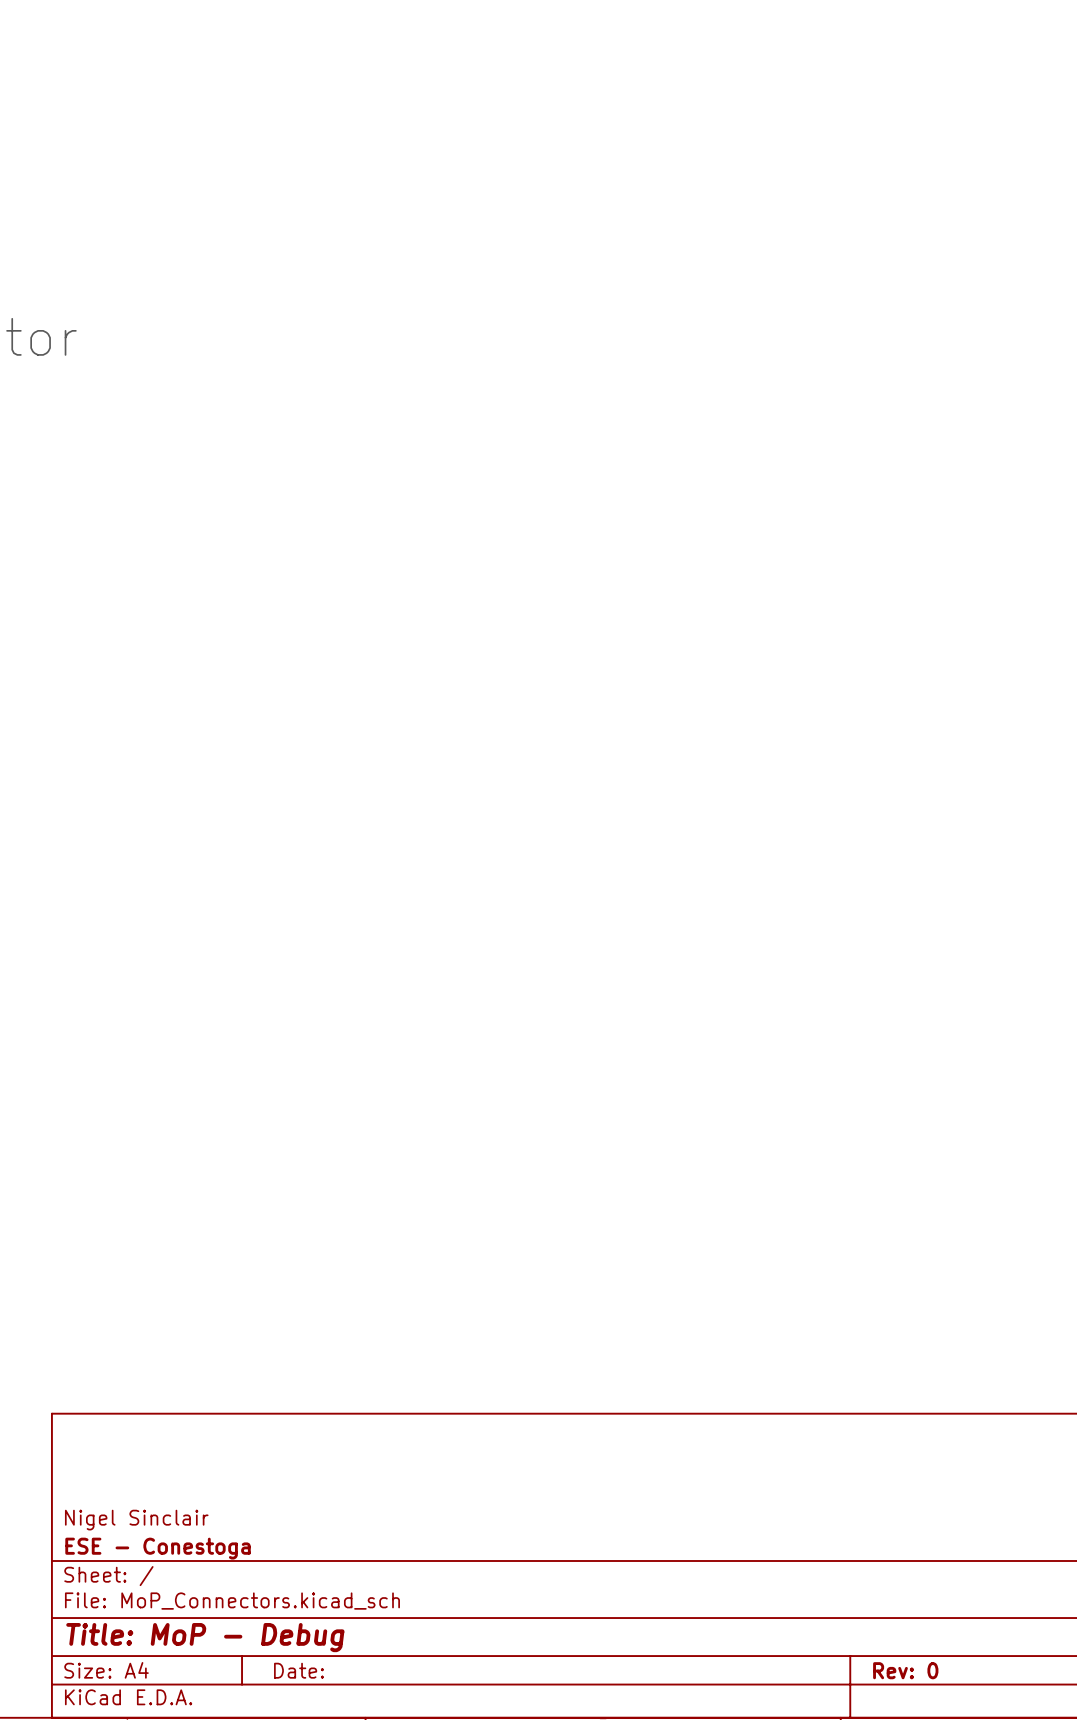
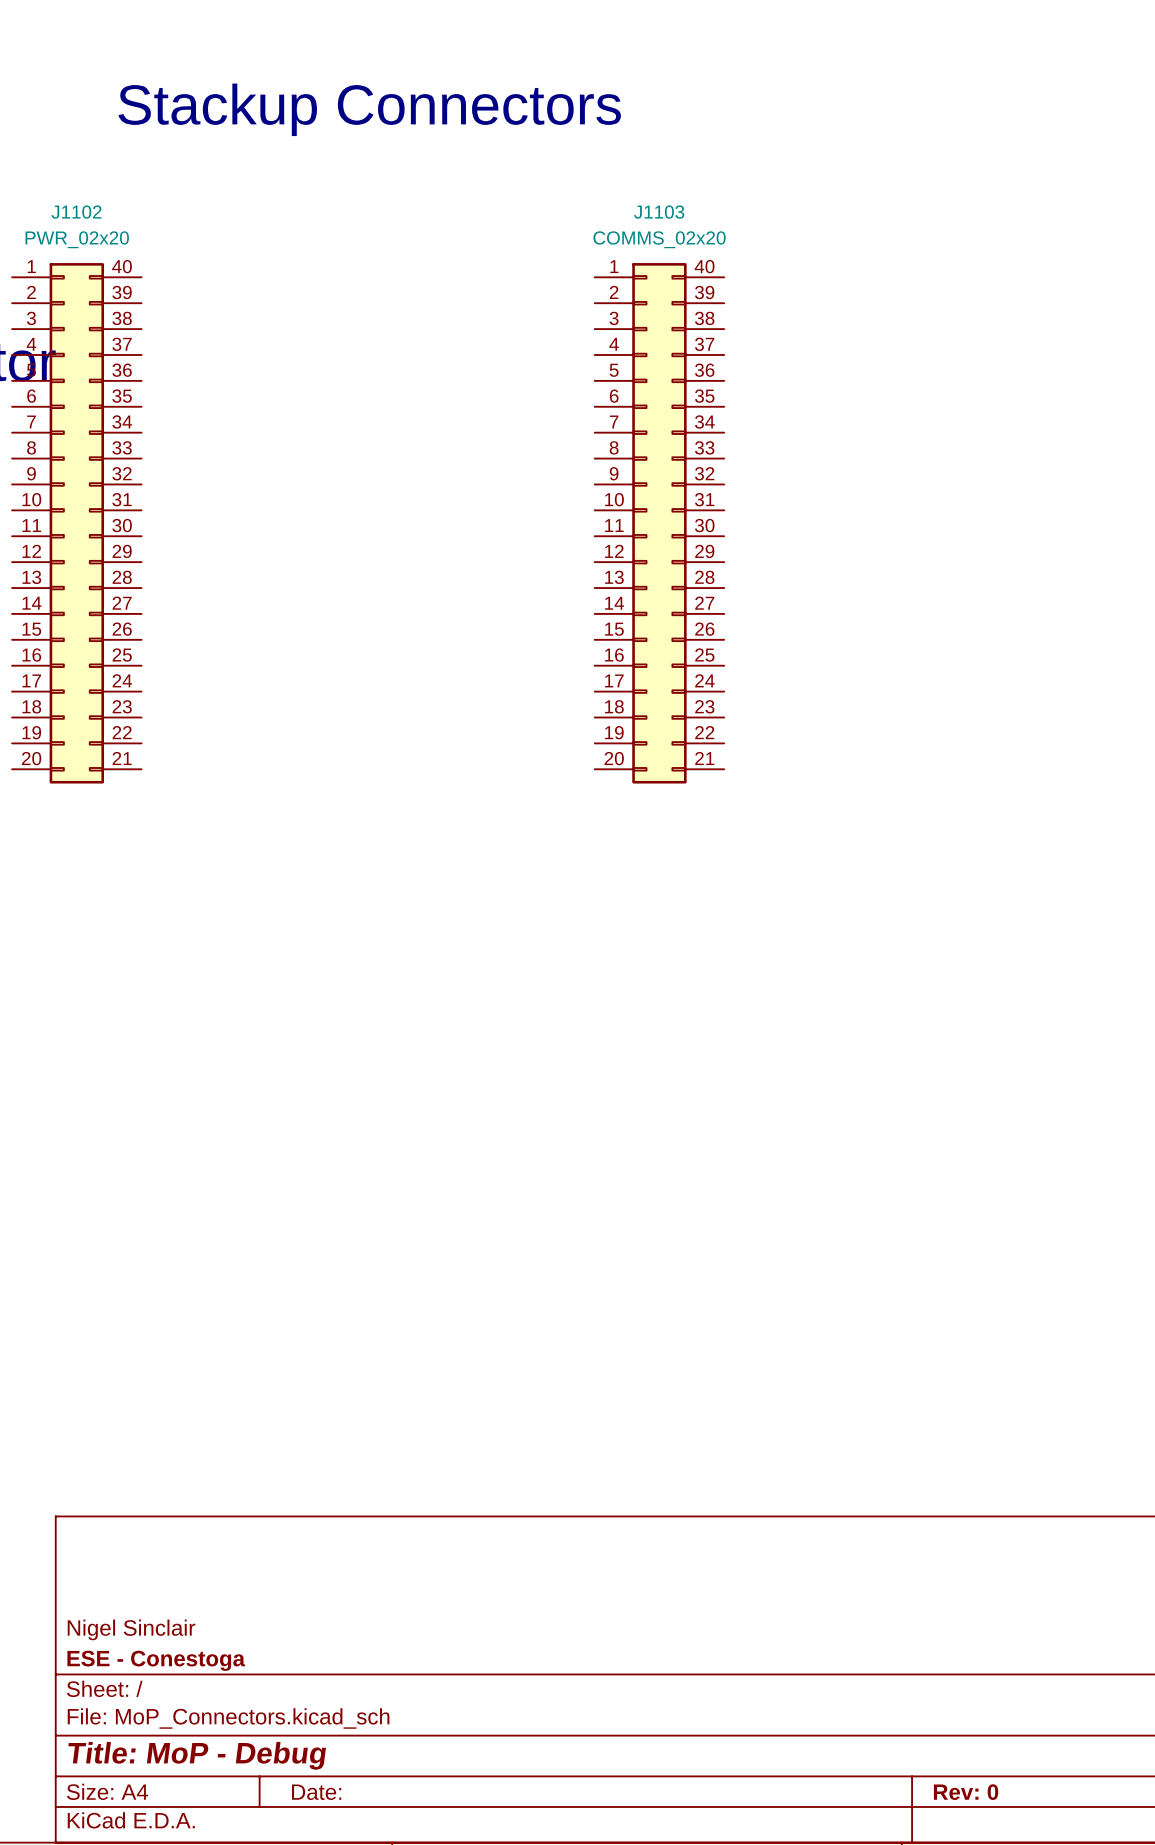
text: none -> Stackup Connectors (369, 109)
J1102: none -> PWR_02x20 (76, 523)
J1103: none -> COMMS_02x20 (659, 523)

